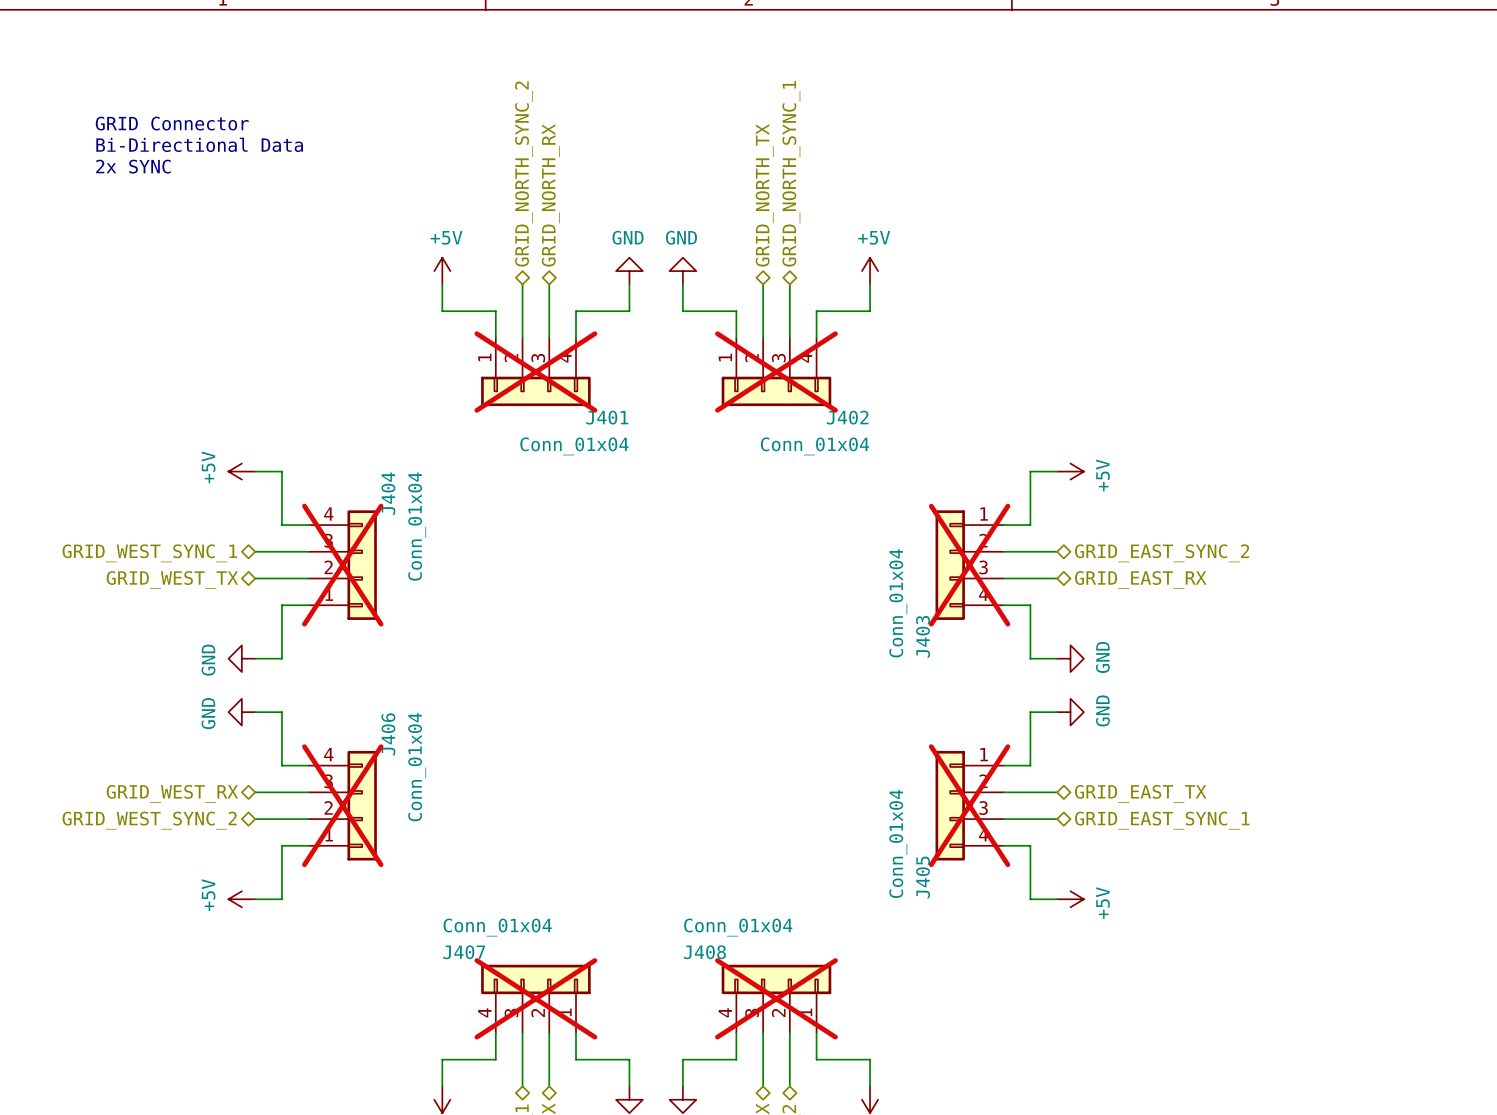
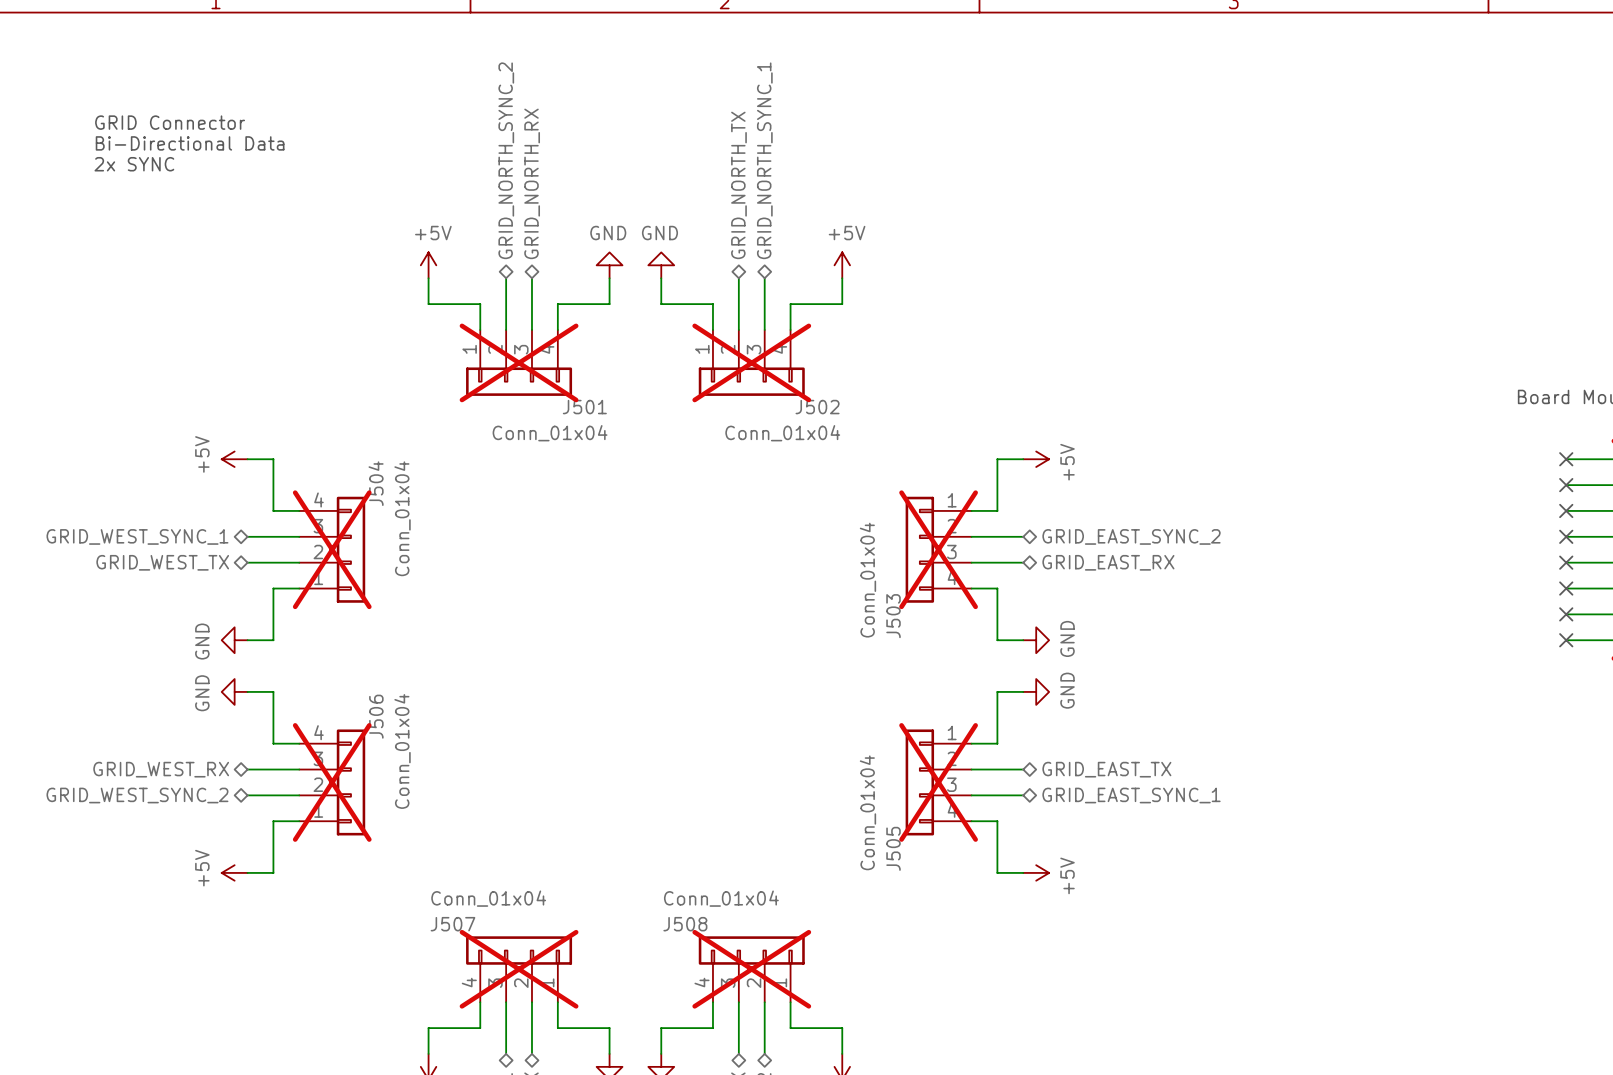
J401 name: J401 (607, 417) -> J501 (584, 407)
J402 name: J402 (847, 417) -> J502 (817, 407)
J404 name: J404 (388, 493) -> J504 (376, 483)
J403 name: J403 (923, 636) -> J503 (893, 616)
J406 name: J406 (388, 734) -> J506 (376, 716)
J405 name: J405 (923, 877) -> J505 (893, 848)
J407 name: J407 (464, 952) -> J507 (452, 924)
J408 name: J408 (704, 952) -> J508 (685, 924)

